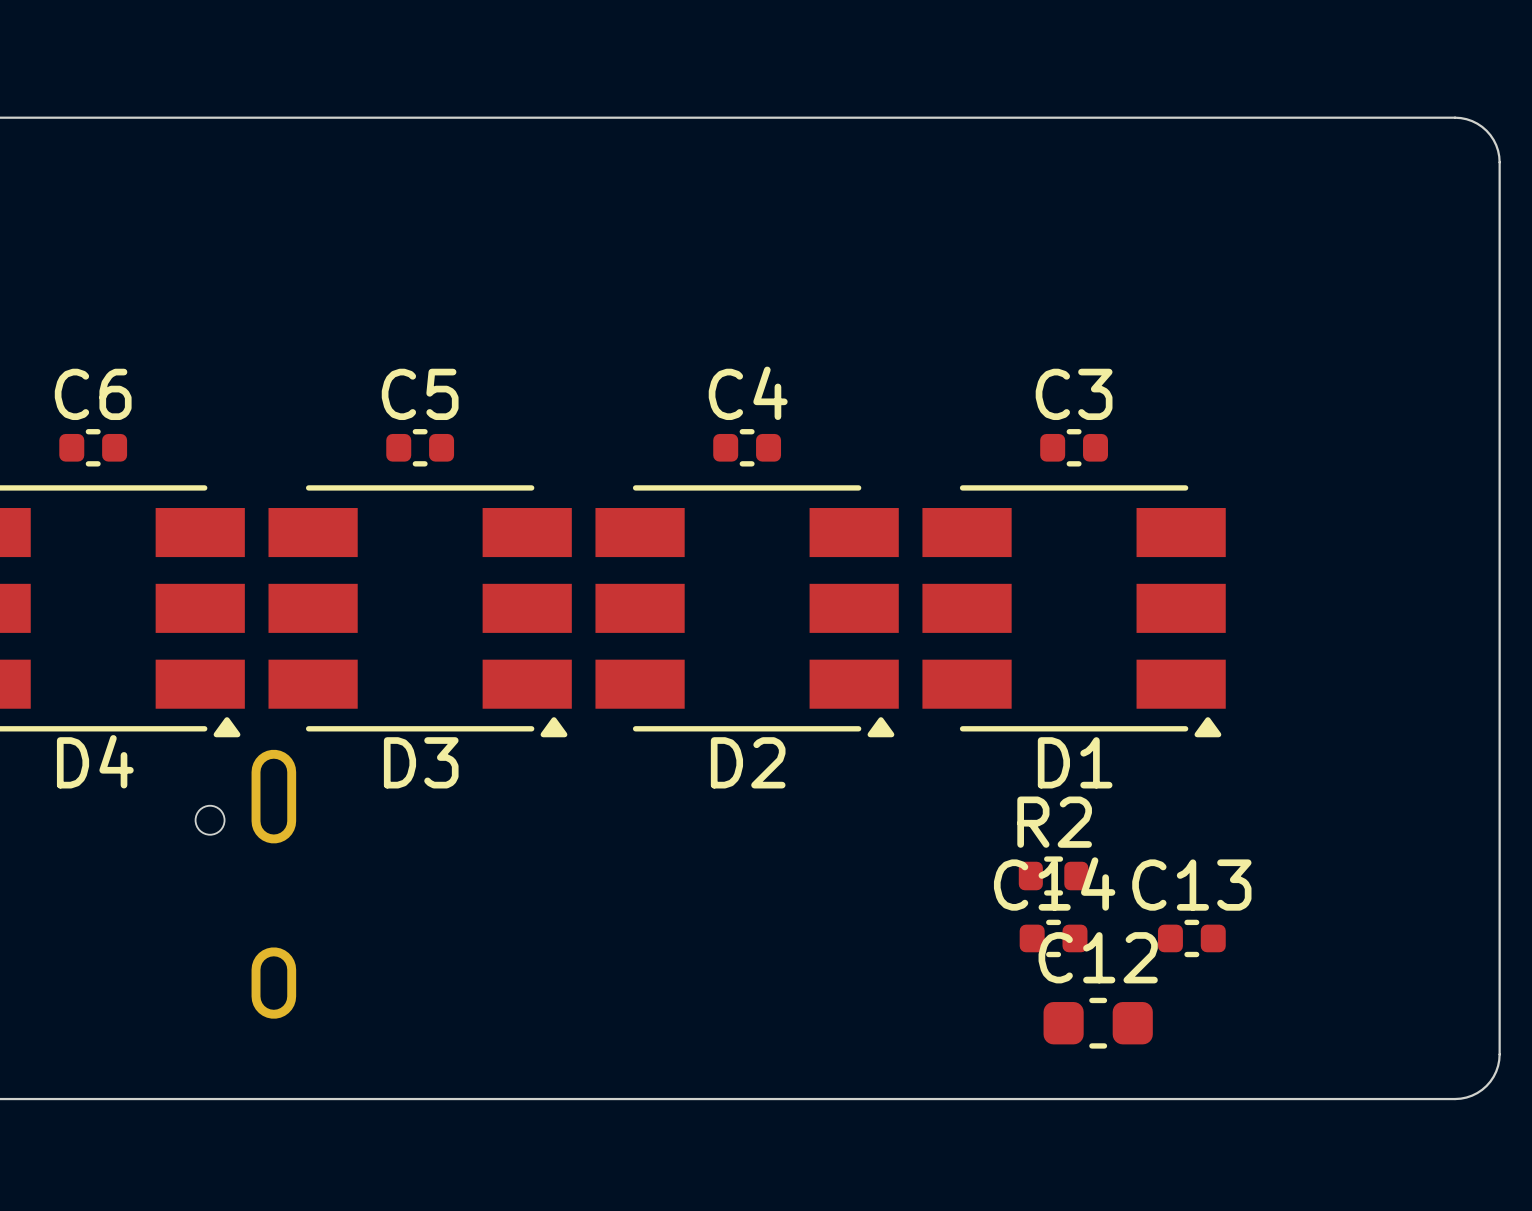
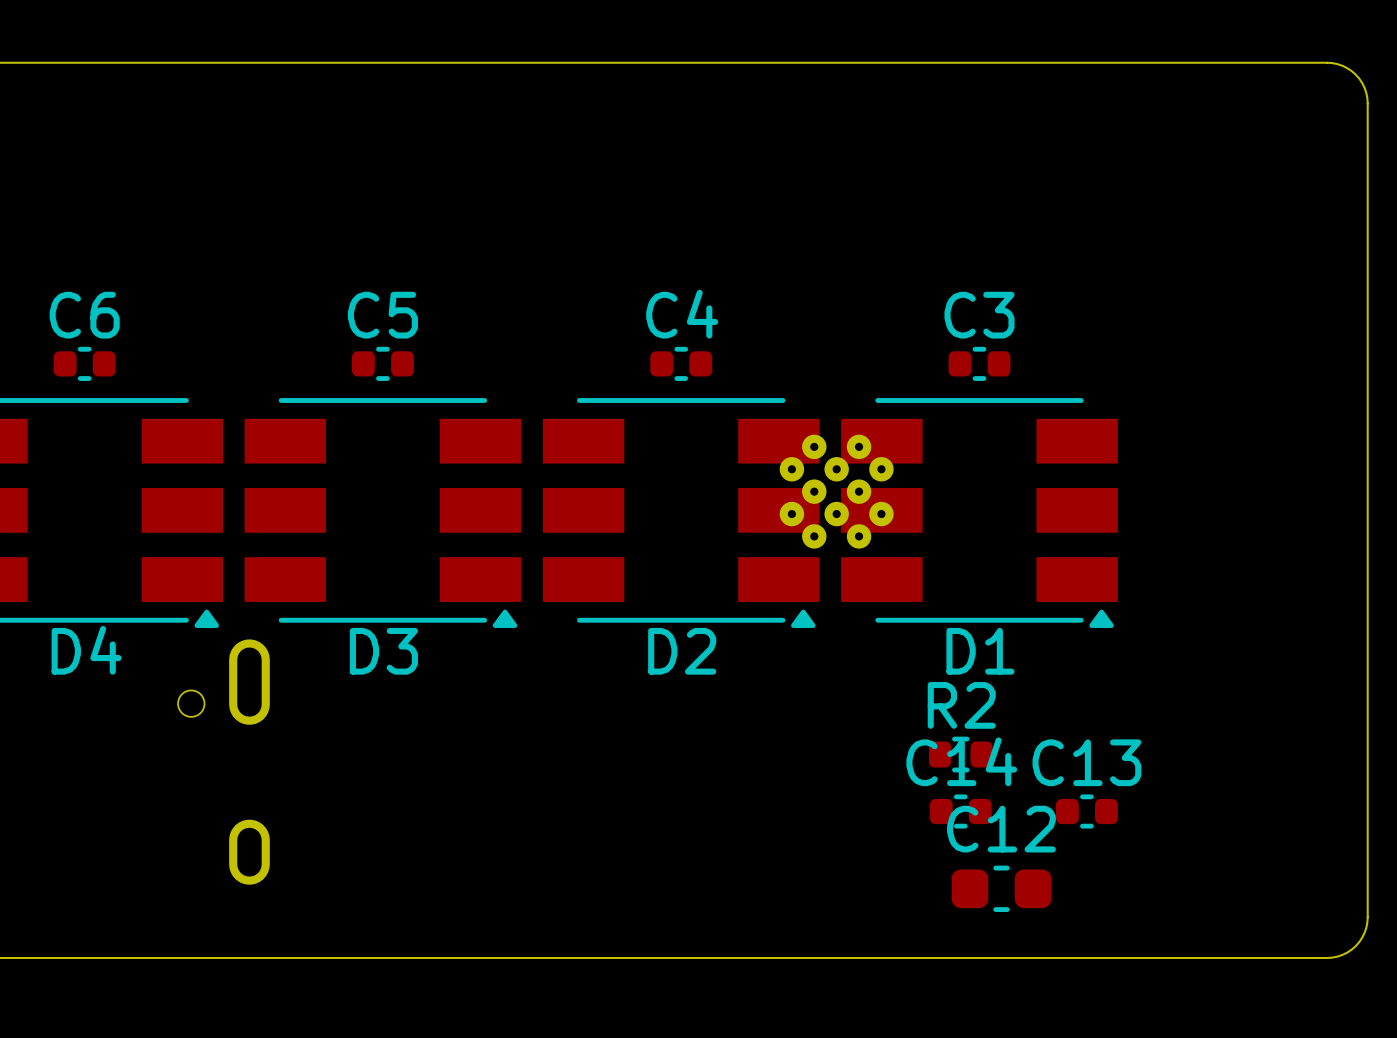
part: none -> (836, 491)

